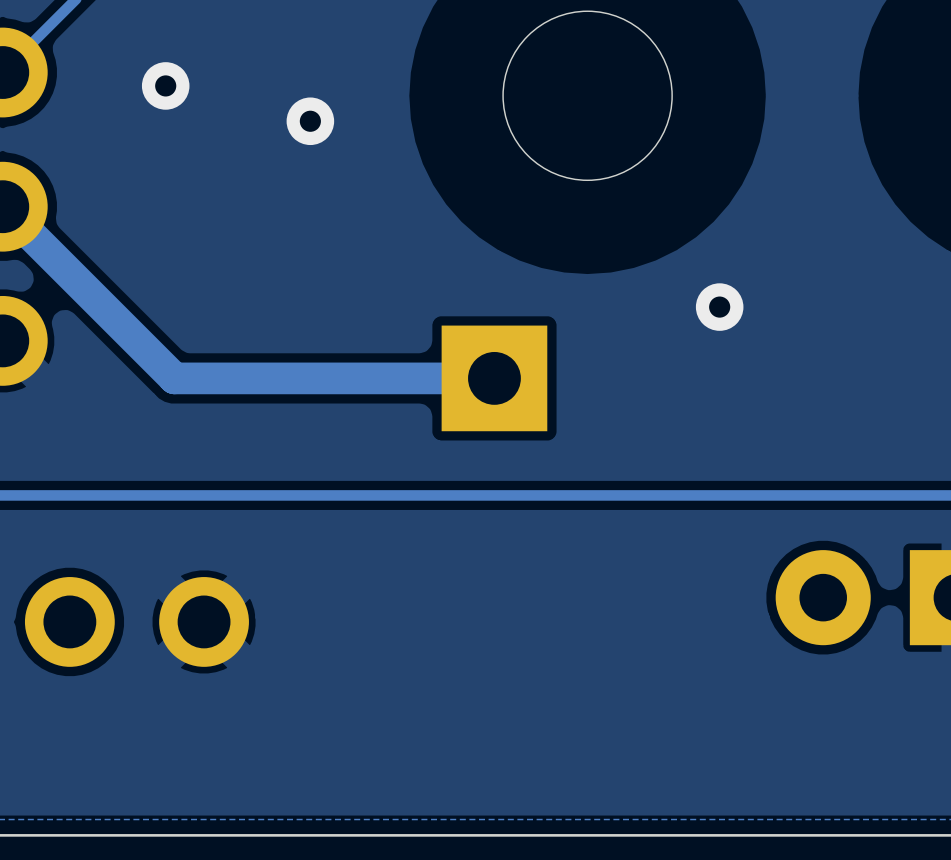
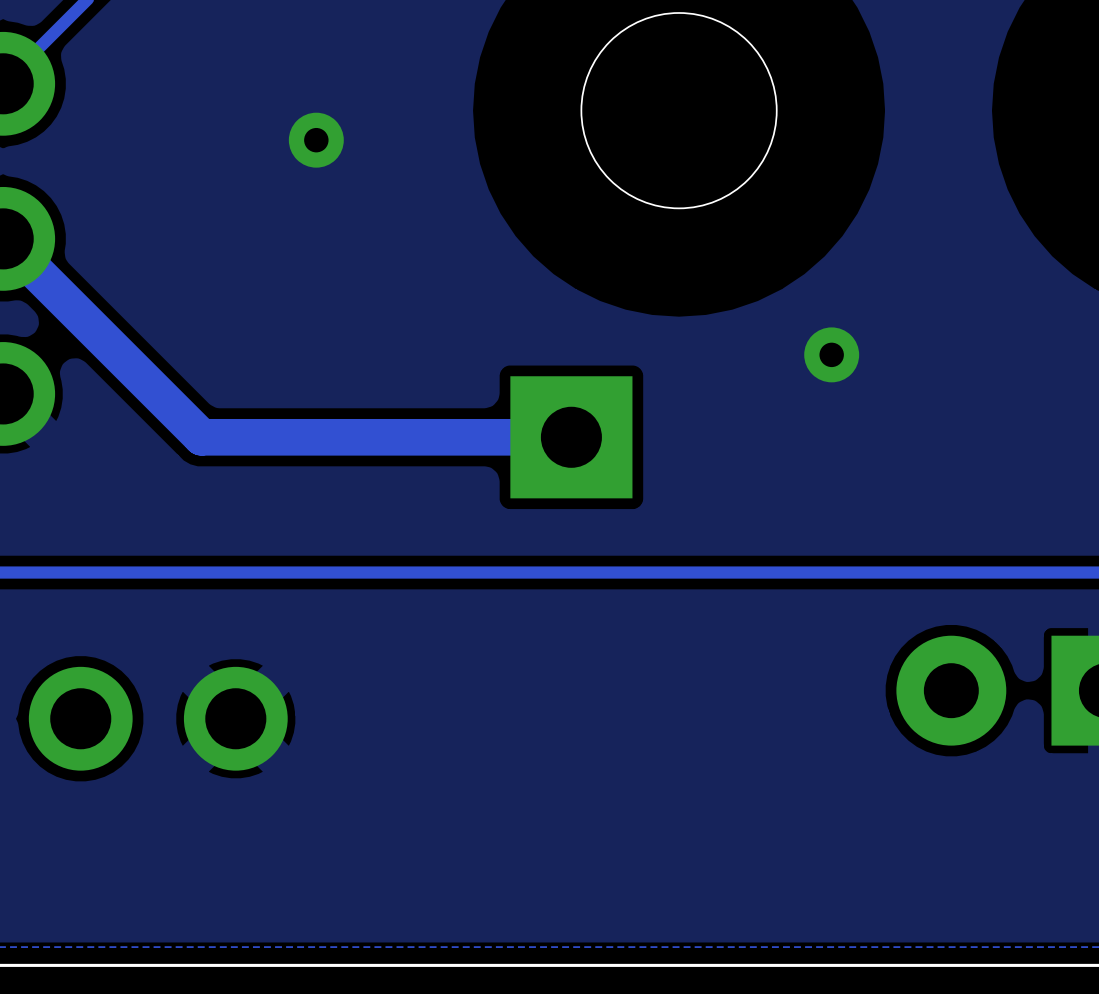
via: (165, 85) -> none
via position: (310, 121) -> (316, 140)

